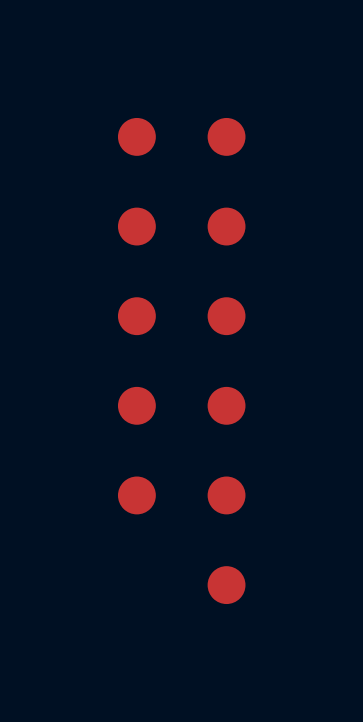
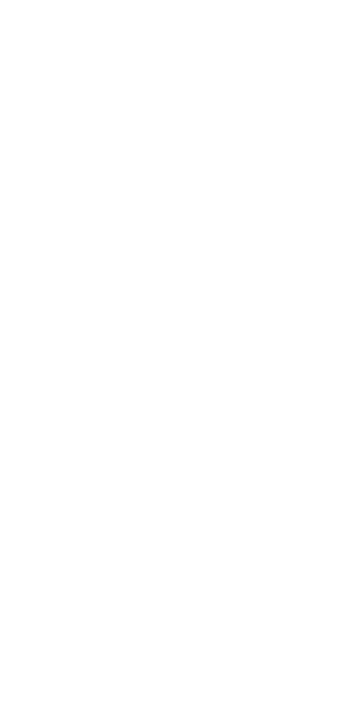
part: (136, 136) -> none
part: (226, 136) -> none
part: (136, 226) -> none
part: (226, 226) -> none
part: (136, 316) -> none
part: (226, 316) -> none
part: (136, 405) -> none
part: (226, 405) -> none
part: (136, 495) -> none
part: (226, 495) -> none
part: (226, 585) -> none

